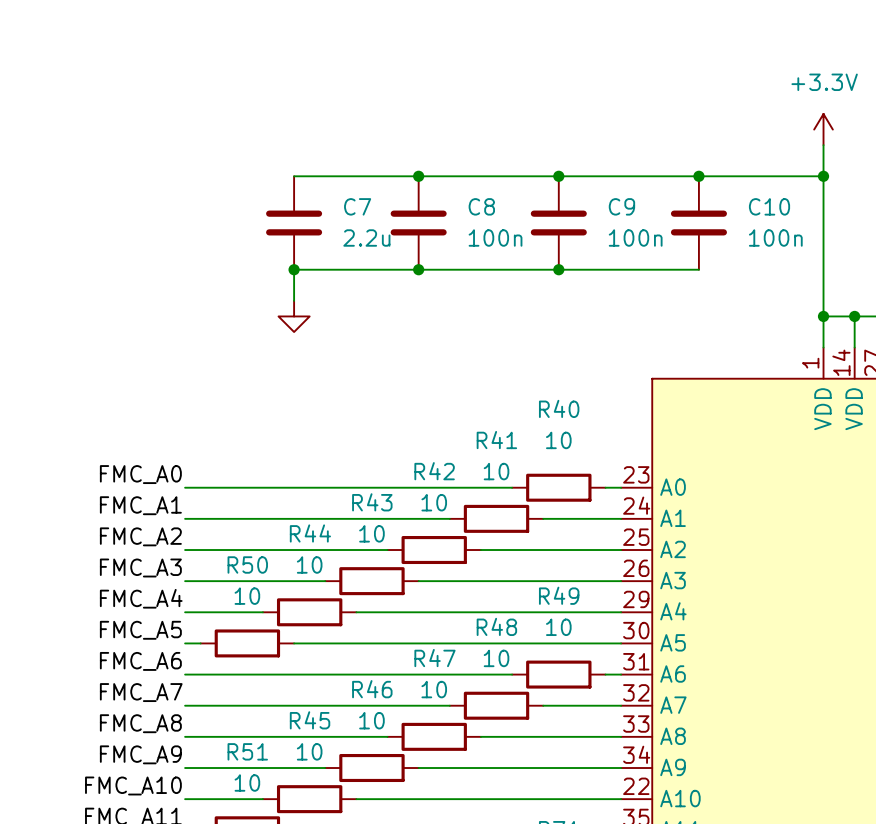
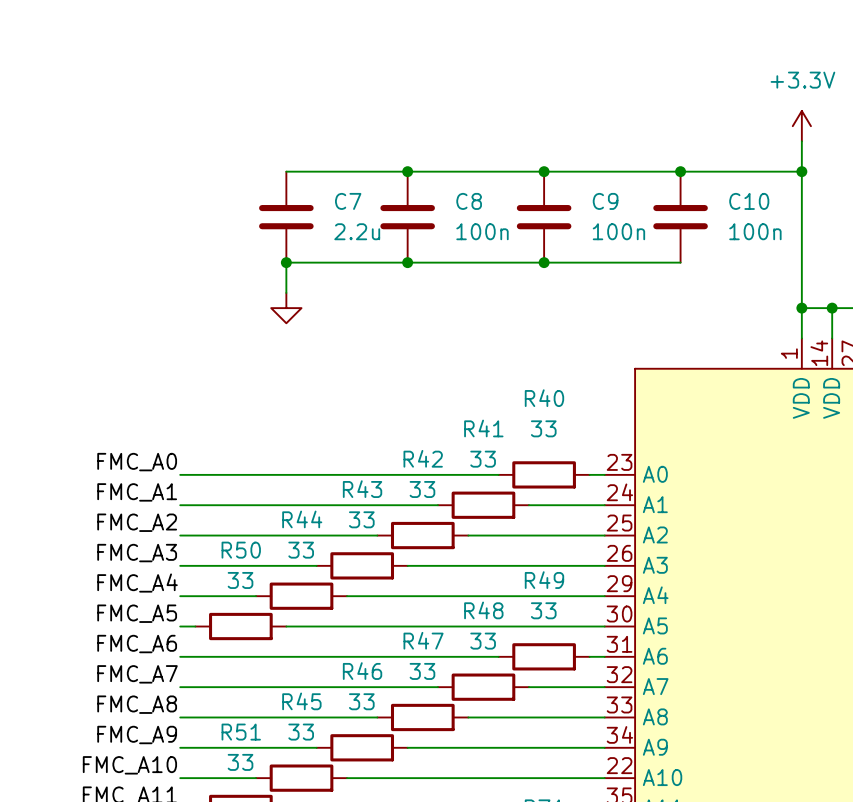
R40 value: 10 (558, 440) -> 33 (543, 428)
R41 value: 10 (496, 471) -> 33 (483, 459)
R42 value: 10 (434, 502) -> 33 (422, 489)
R43 value: 10 (371, 533) -> 33 (361, 519)
R44 value: 10 (309, 564) -> 33 (301, 550)
R50 value: 10 (247, 596) -> 33 (240, 580)
R49 value: 10 (558, 627) -> 33 (543, 610)
R48 value: 10 (496, 658) -> 33 (483, 641)
R47 value: 10 (434, 689) -> 33 (422, 671)
R46 value: 10 (371, 720) -> 33 (361, 701)
R45 value: 10 (309, 751) -> 33 (301, 732)
R51 value: 10 (247, 782) -> 33 (240, 762)

